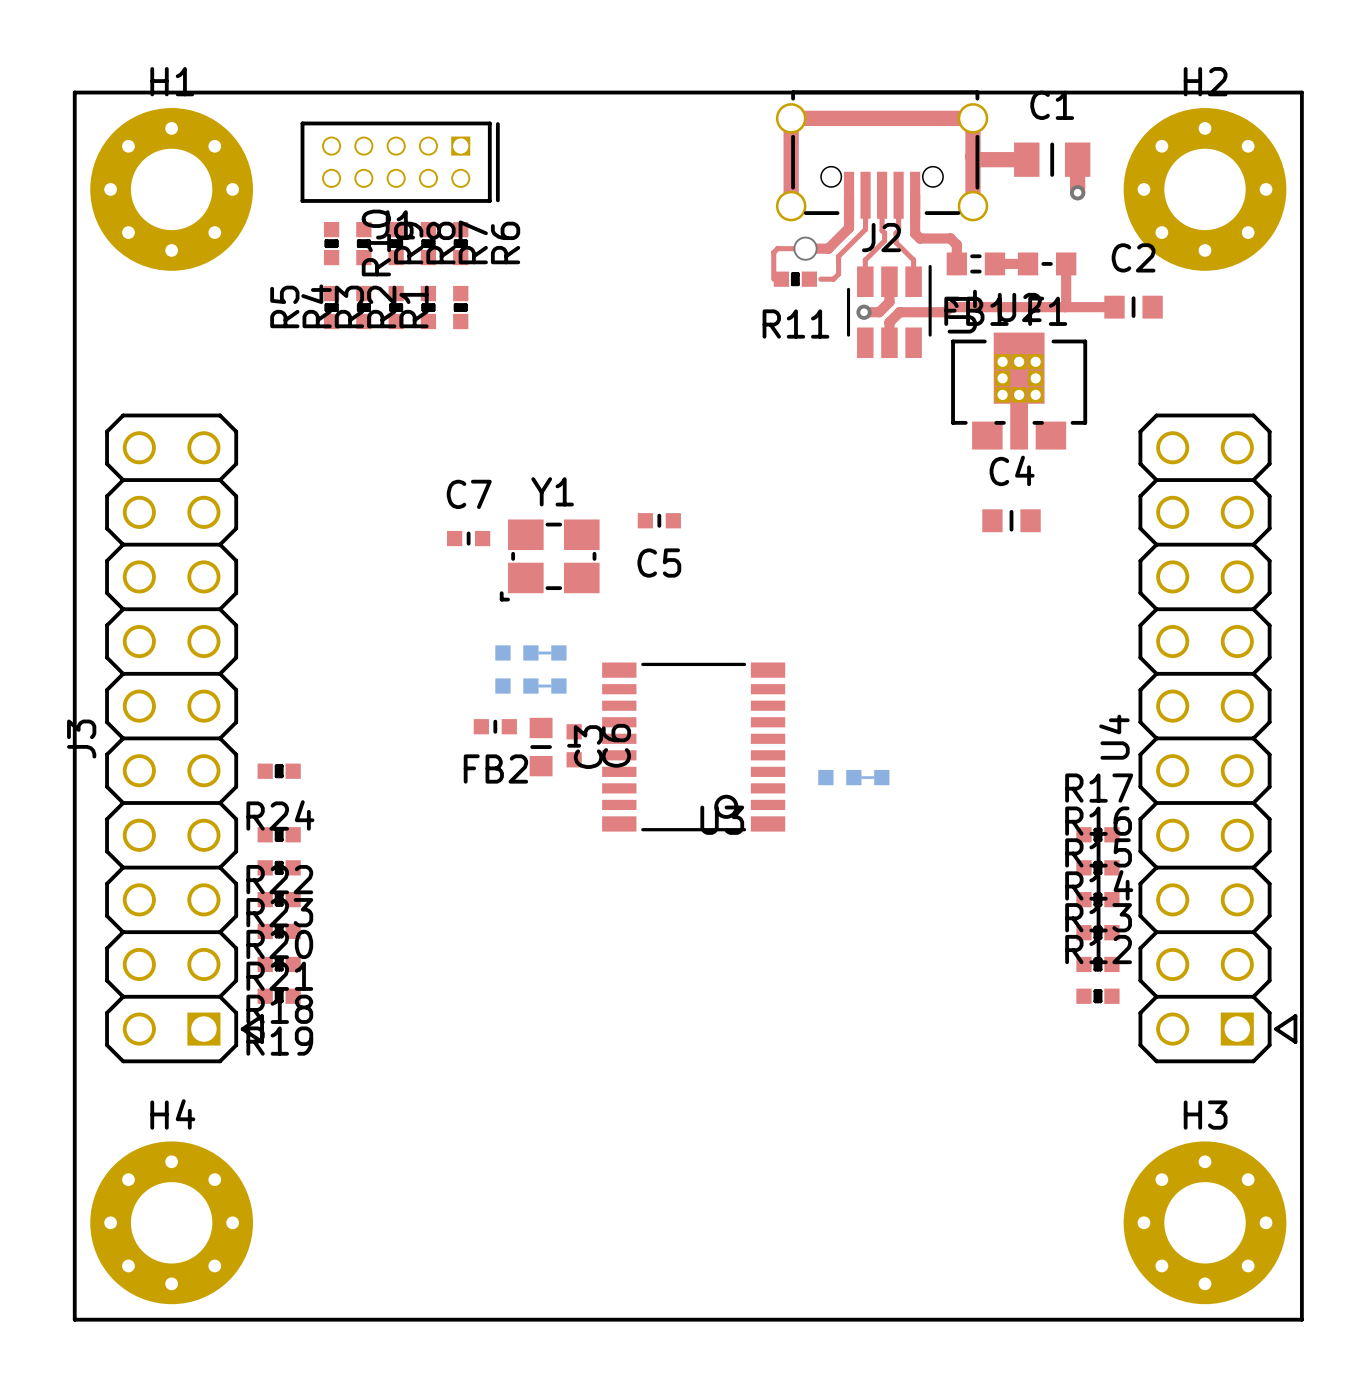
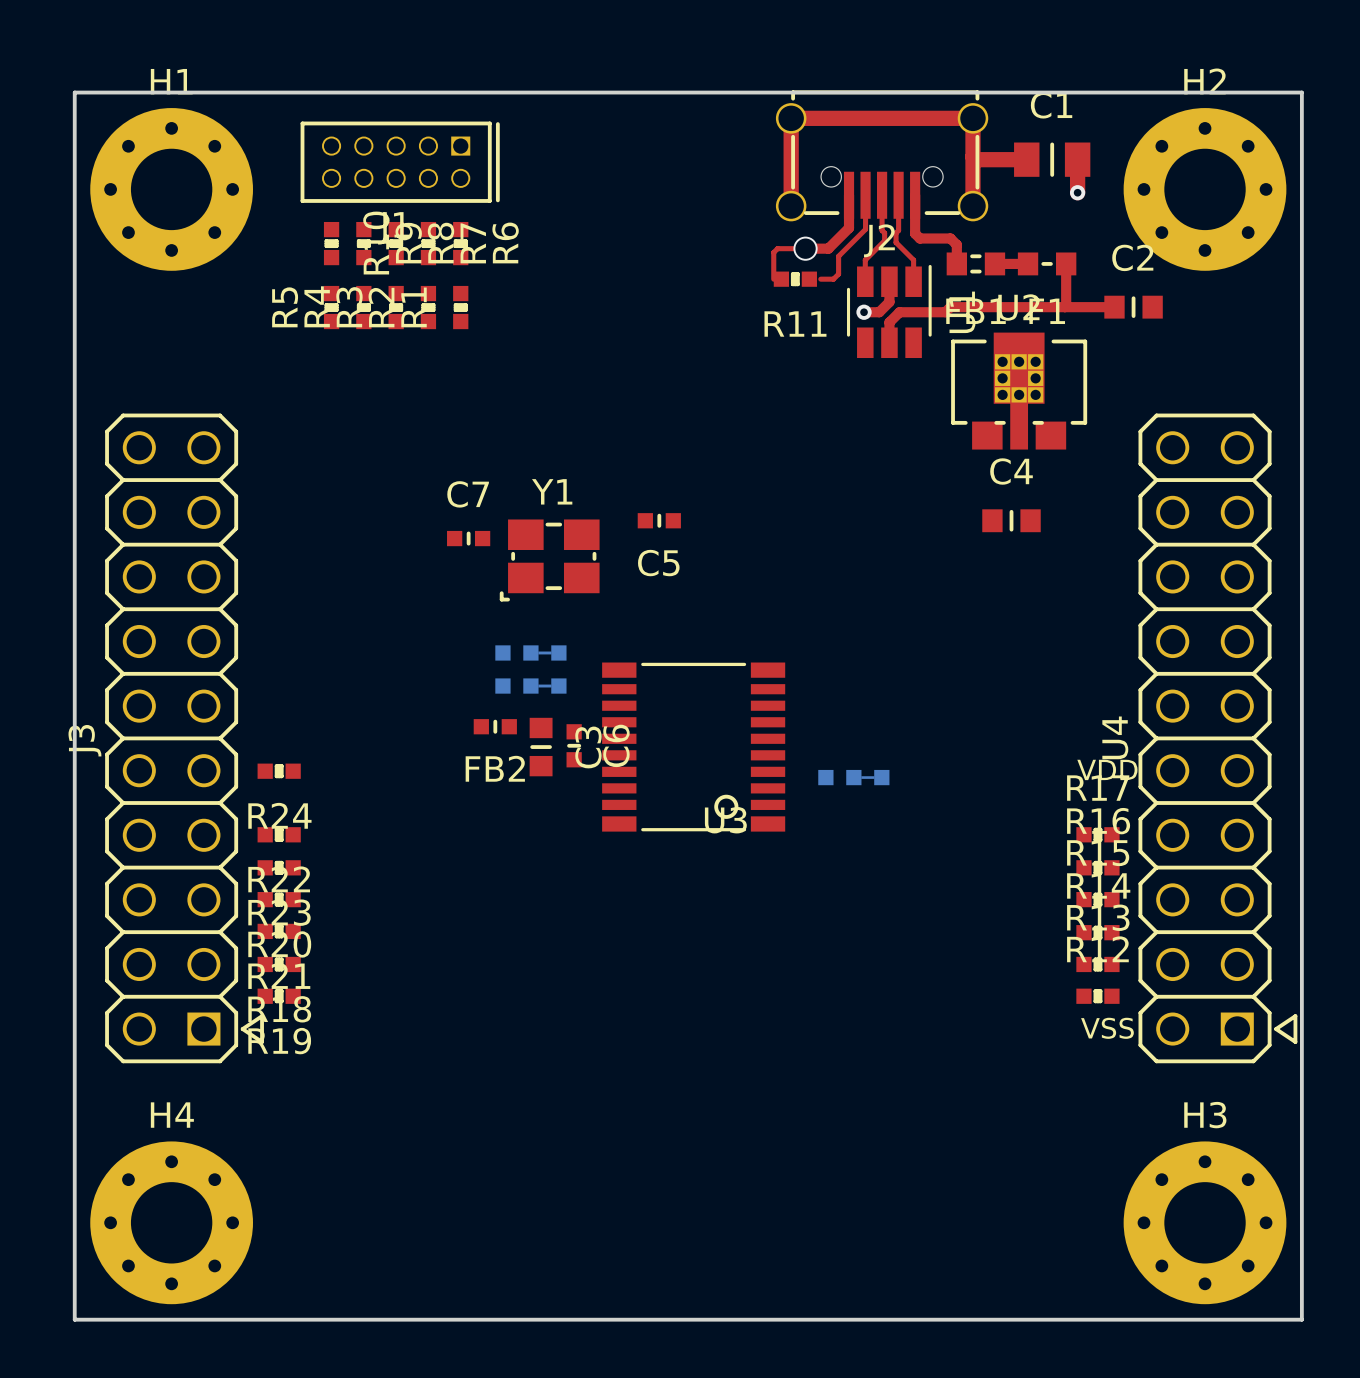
U4 text: none -> VDD (1107, 769)
U4 text: none -> VSS (1107, 1028)

